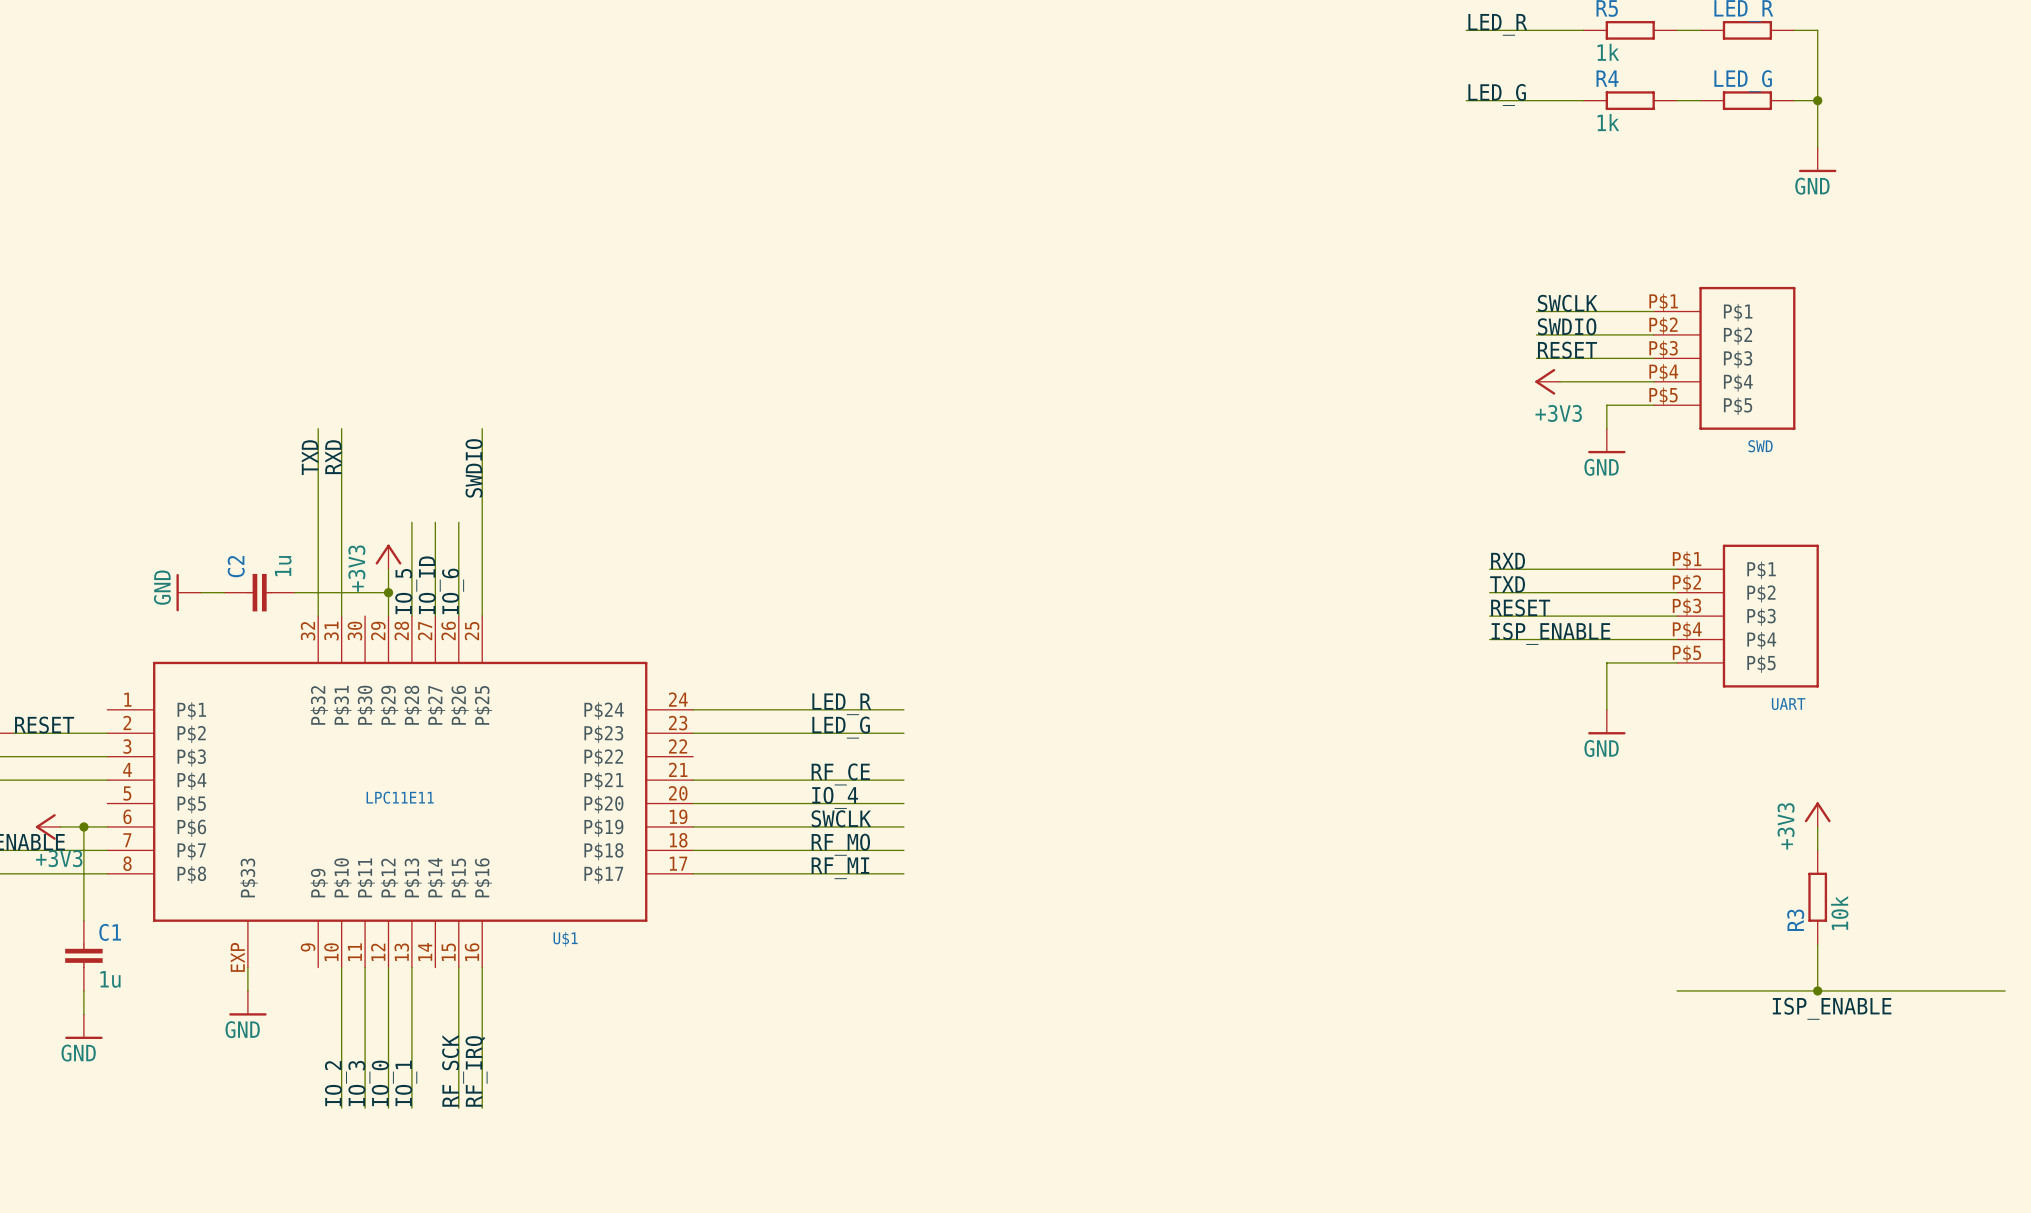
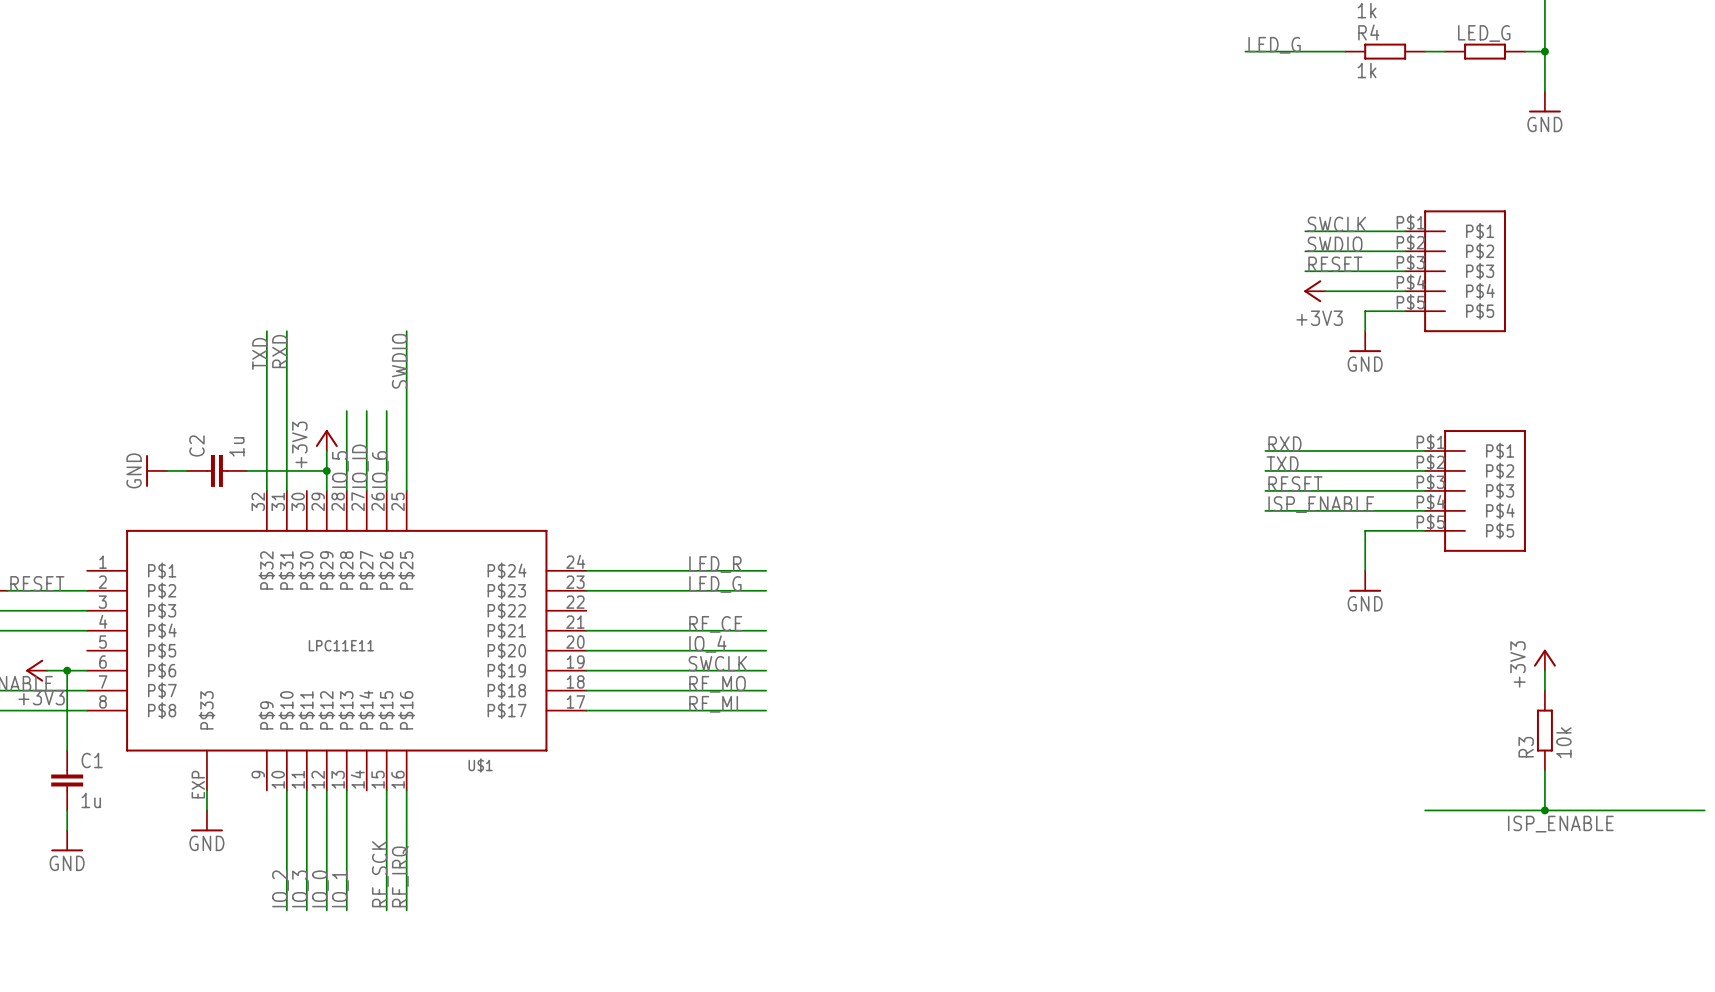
part: none -> (1455, 271)
SWD: (1724, 358) -> none
part: none -> (1475, 490)
UART: (1747, 616) -> none

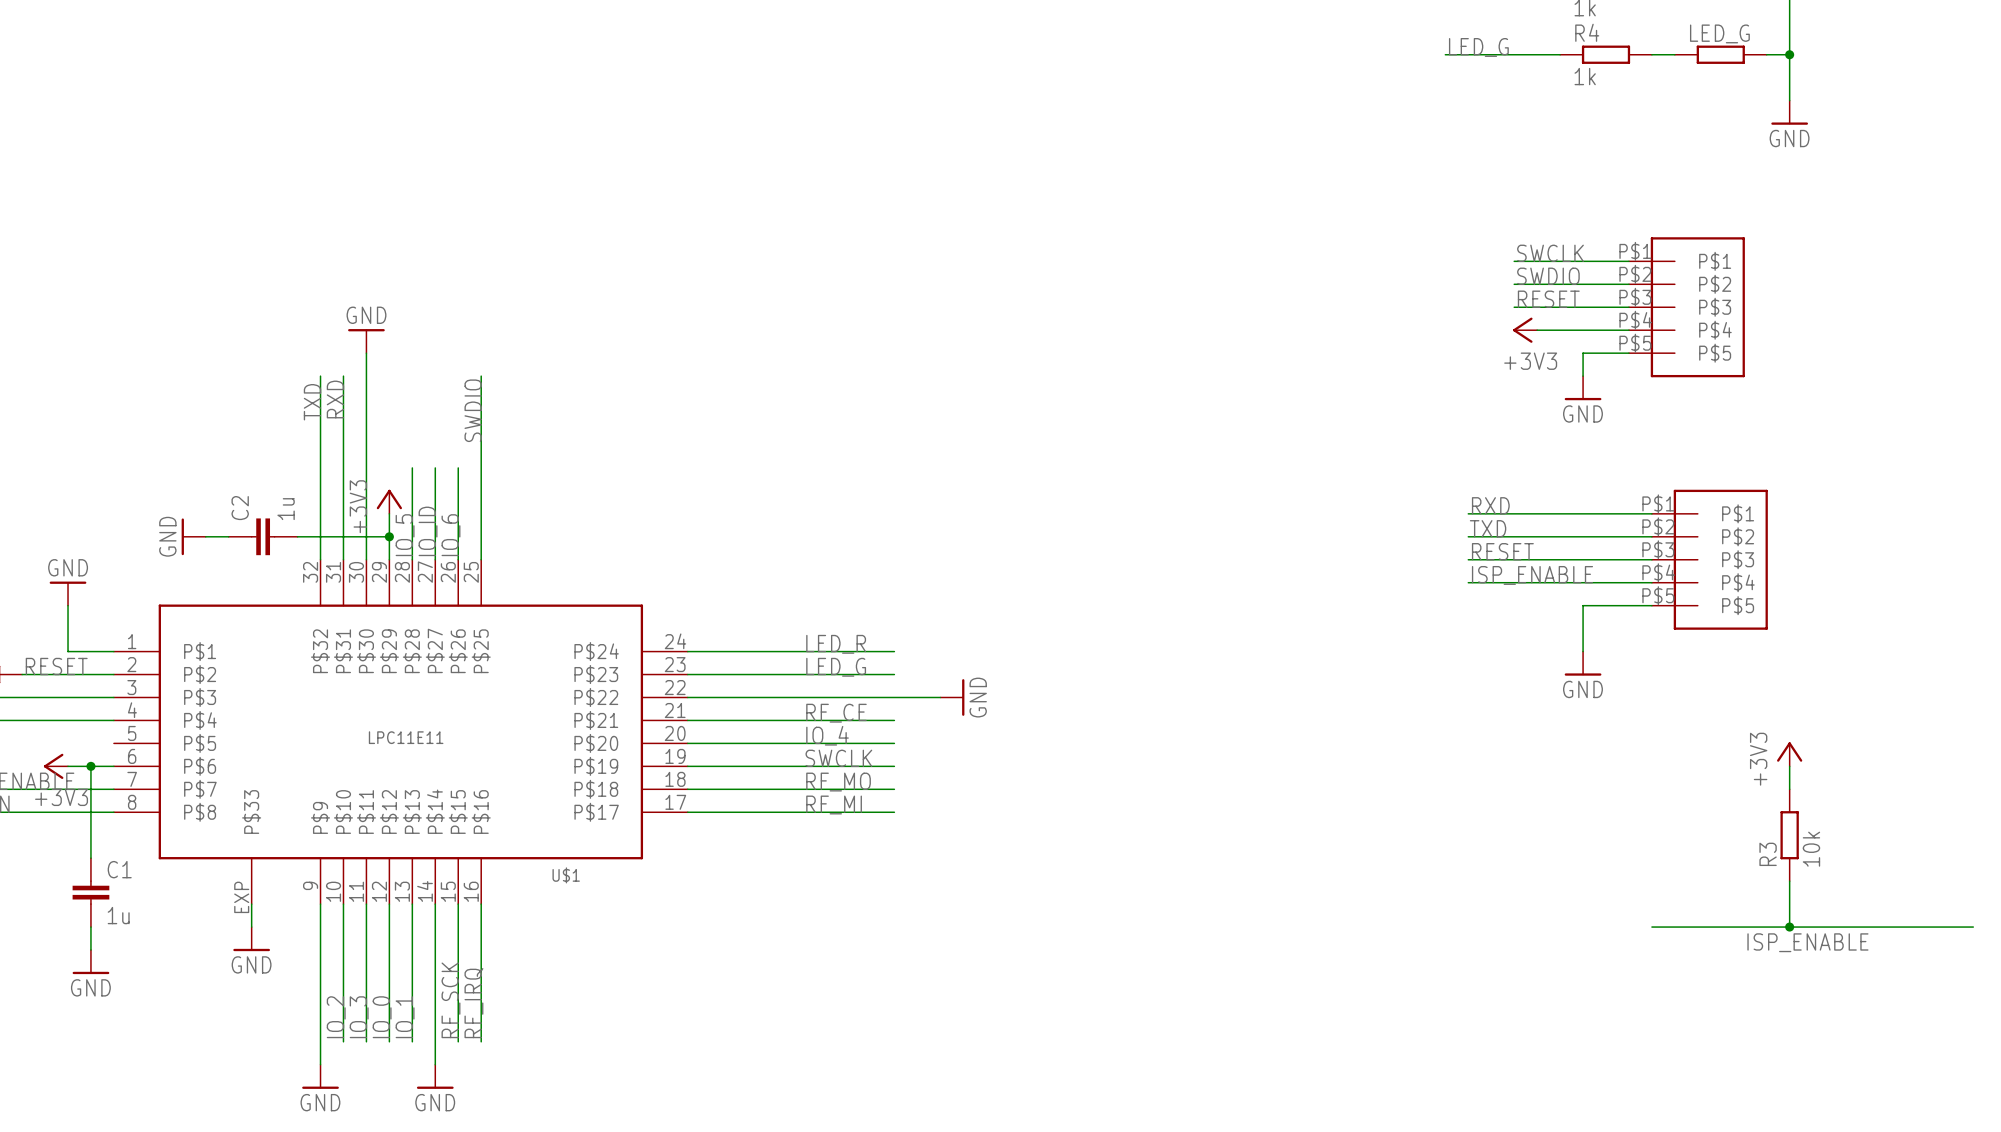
power symbol: none -> GND (366, 341)
wire: none -> (366, 353) (366, 559)
power symbol: none -> GND (68, 593)
wire: none -> (68, 605) (68, 651) (113, 651)
wire: none -> (687, 697) (940, 697)
power symbol: none -> GND (952, 697)
wire: none -> (320, 904) (320, 1064)
wire: none -> (435, 904) (435, 1064)
power symbol: none -> GND (320, 1076)
power symbol: none -> GND (435, 1076)

